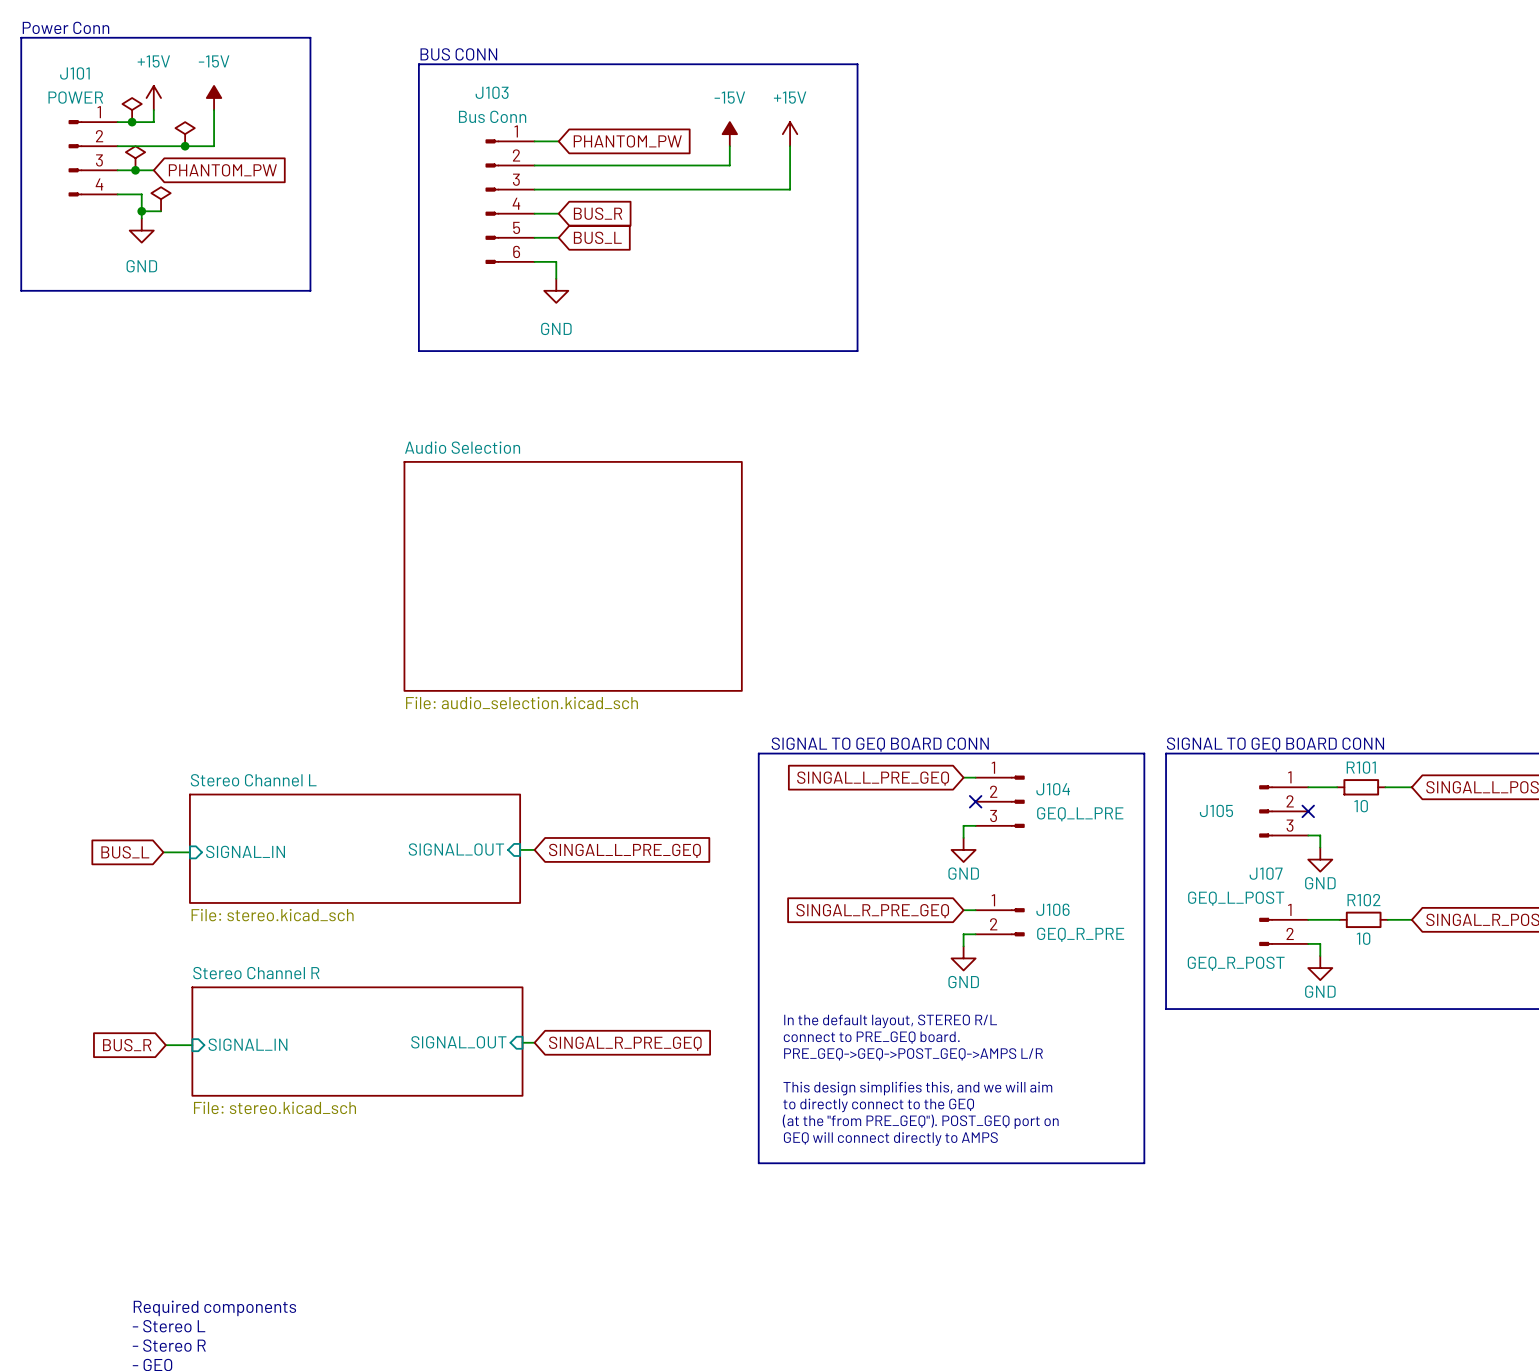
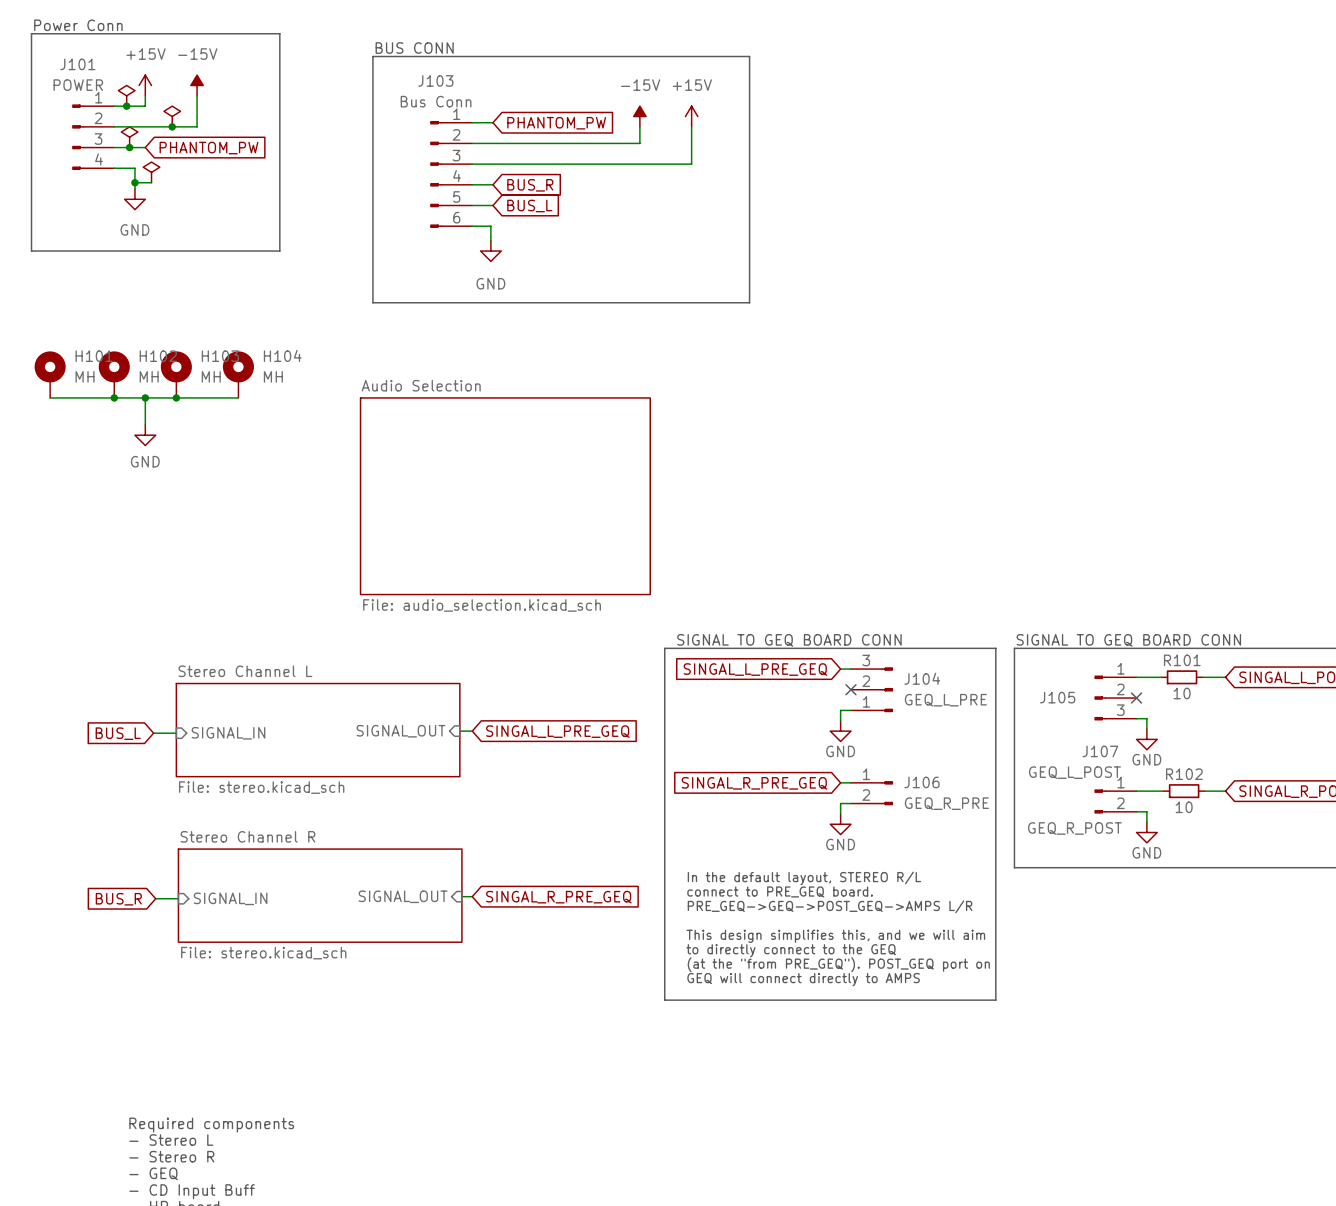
H101: none -> MH (50, 374)
H102: none -> MH (114, 374)
H103: none -> MH (176, 374)
H104: none -> MH (238, 374)
wire: none -> (50, 397) (238, 397)
junction: none -> (114, 397)
wire: none -> (145, 397) (145, 424)
junction: none -> (145, 397)
junction: none -> (176, 397)
power symbol: none -> GND (145, 435)
J104 flip: as is (1017, 801) -> up-down (887, 689)

